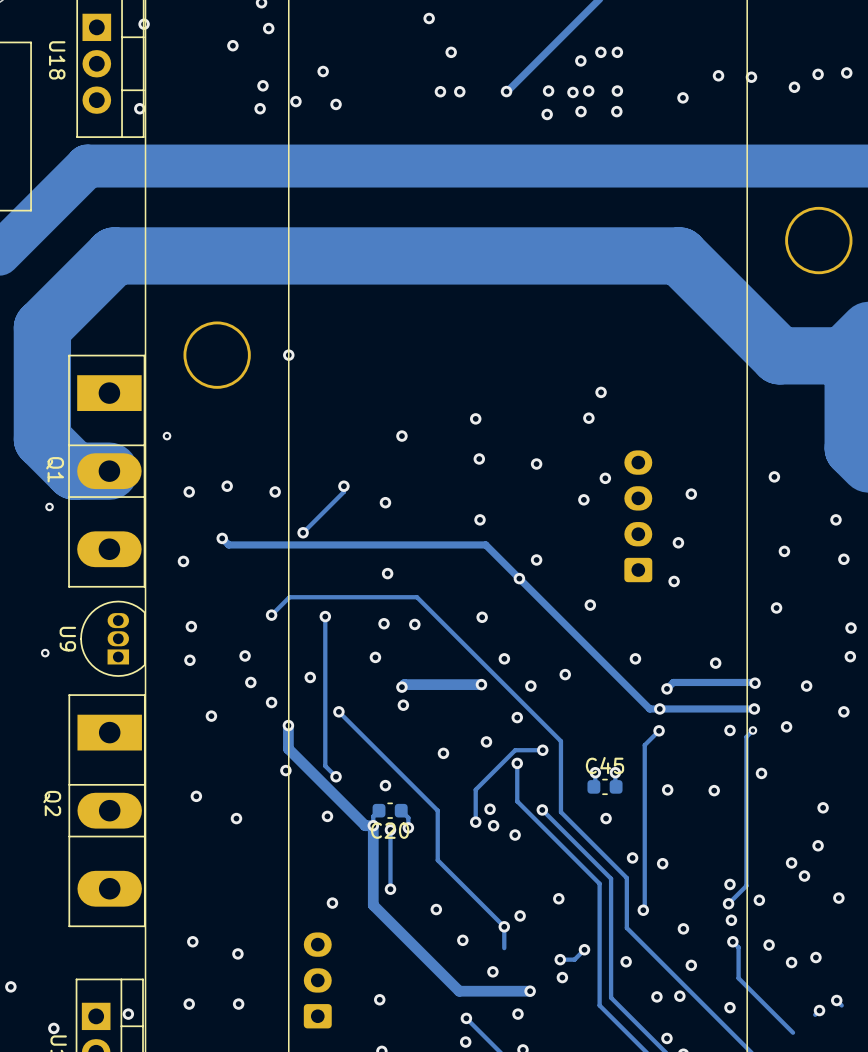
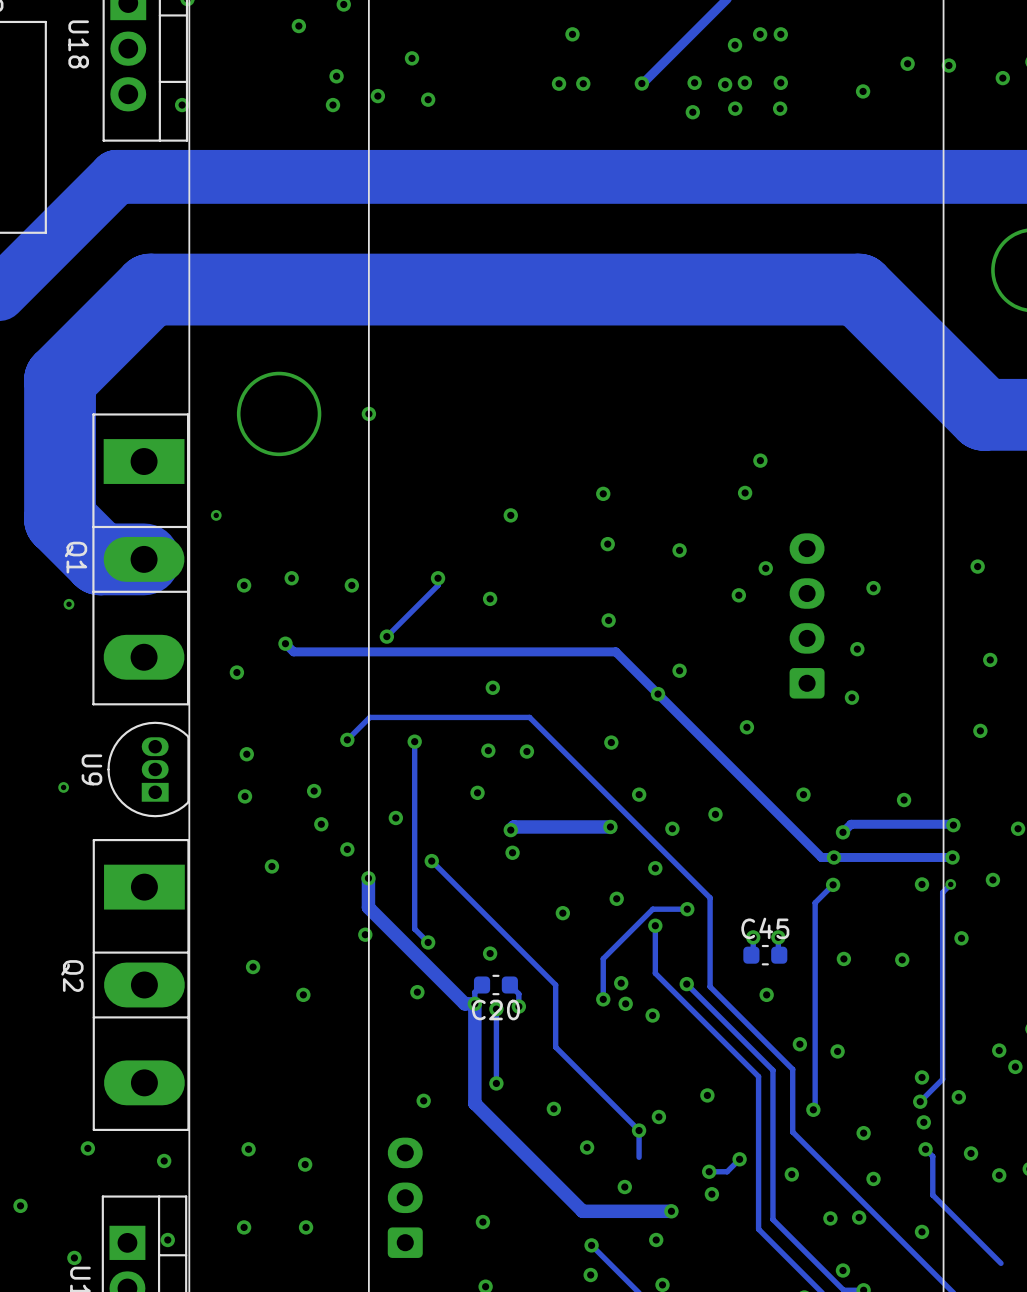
via: none -> (87, 1148)
via: none -> (164, 1160)

